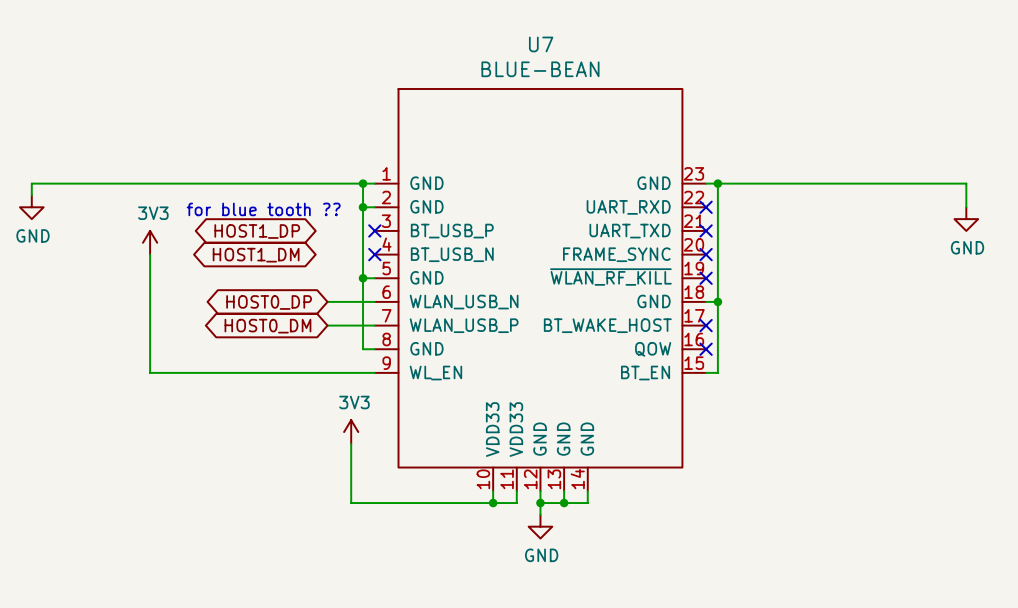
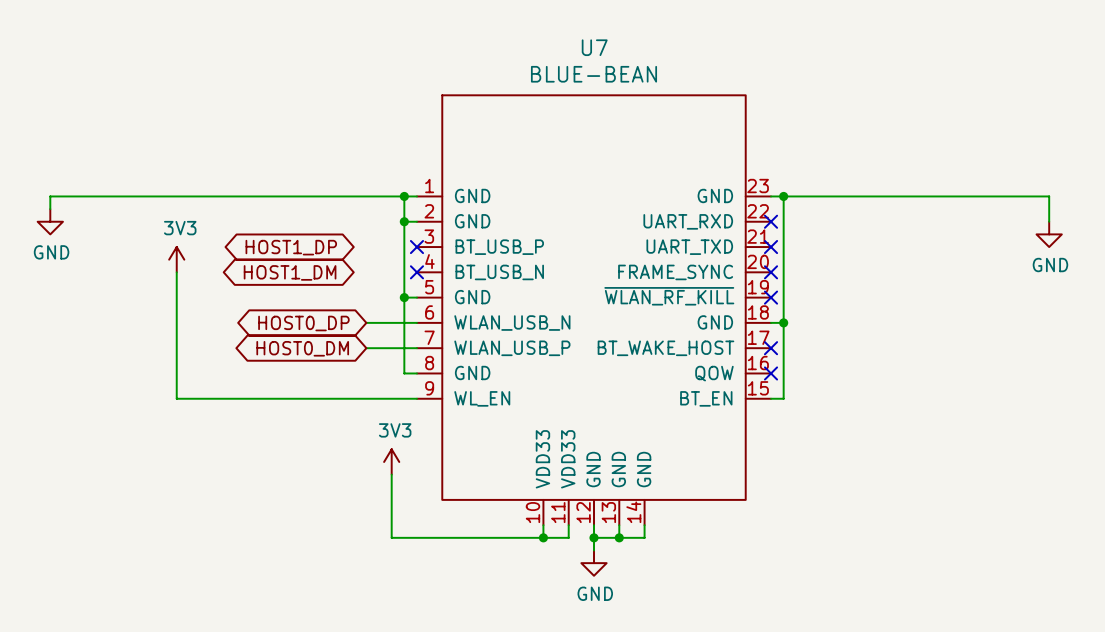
text: for blue tooth ?? (263, 209) -> none

